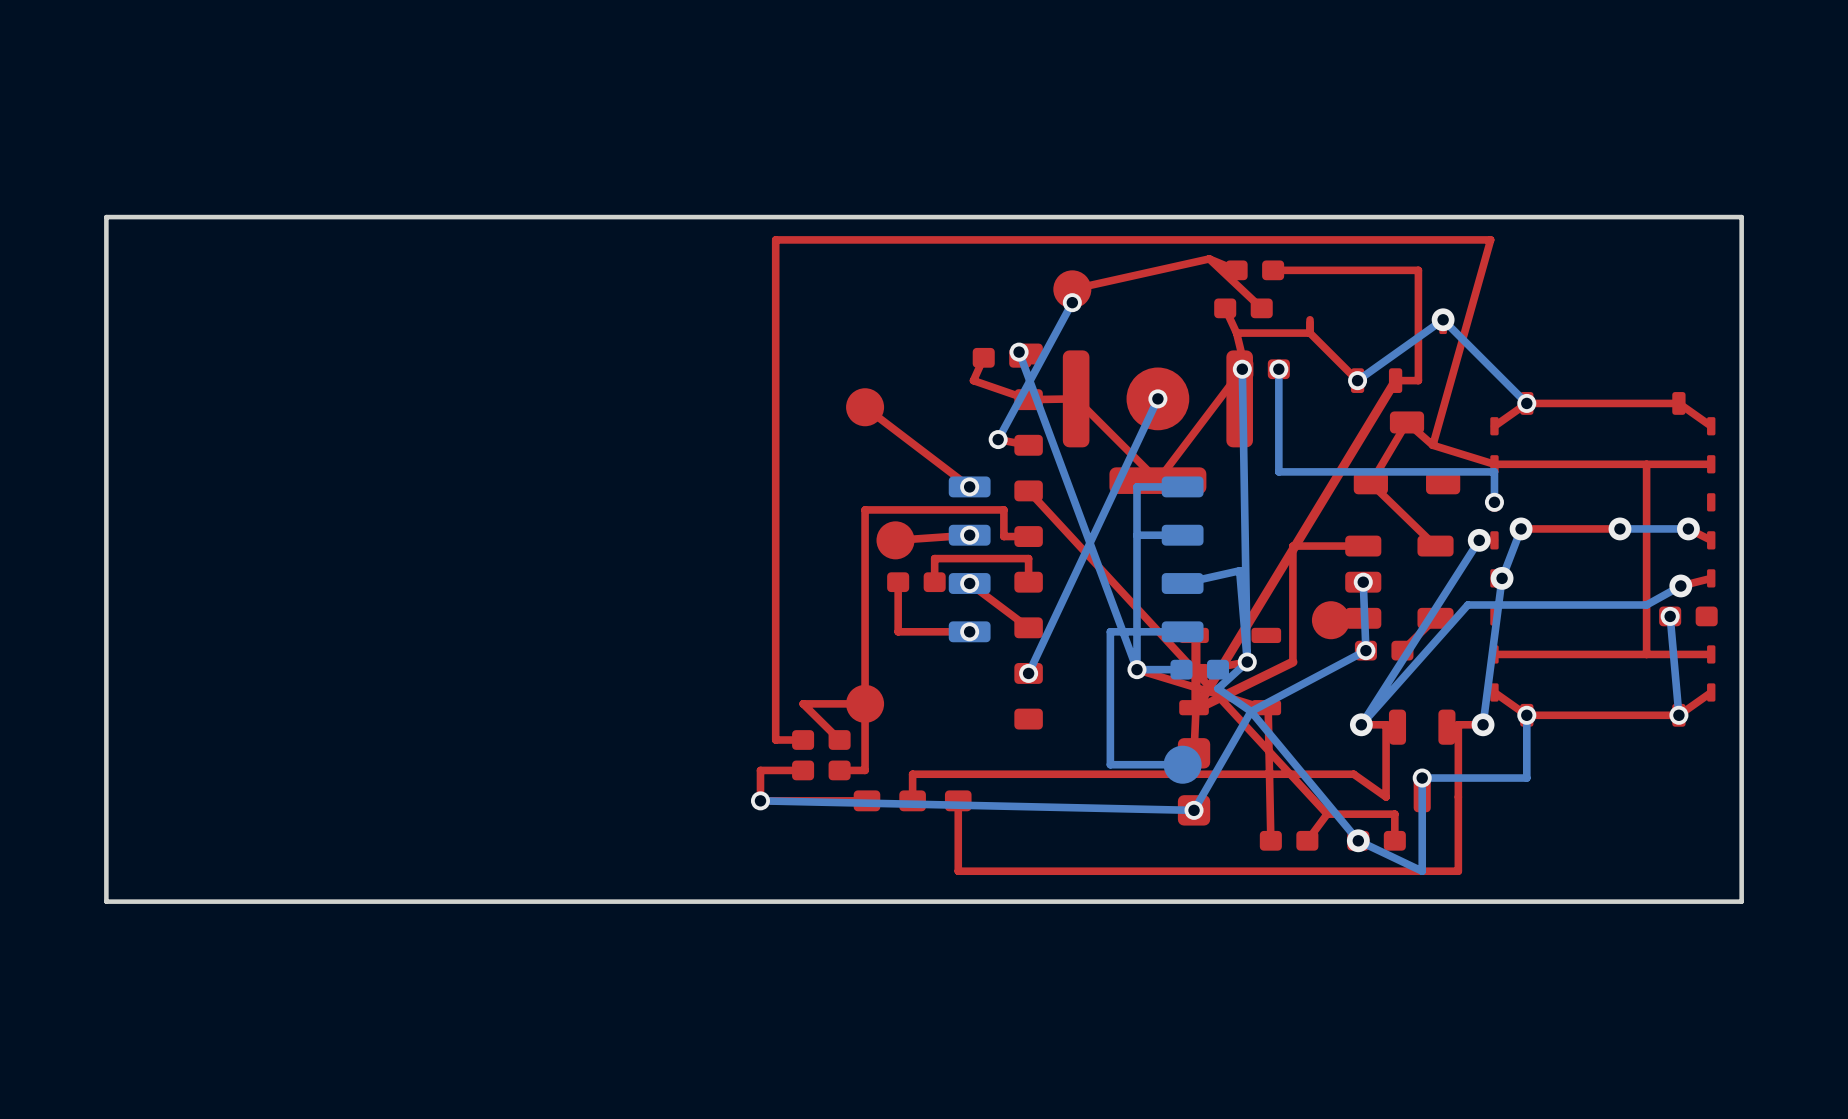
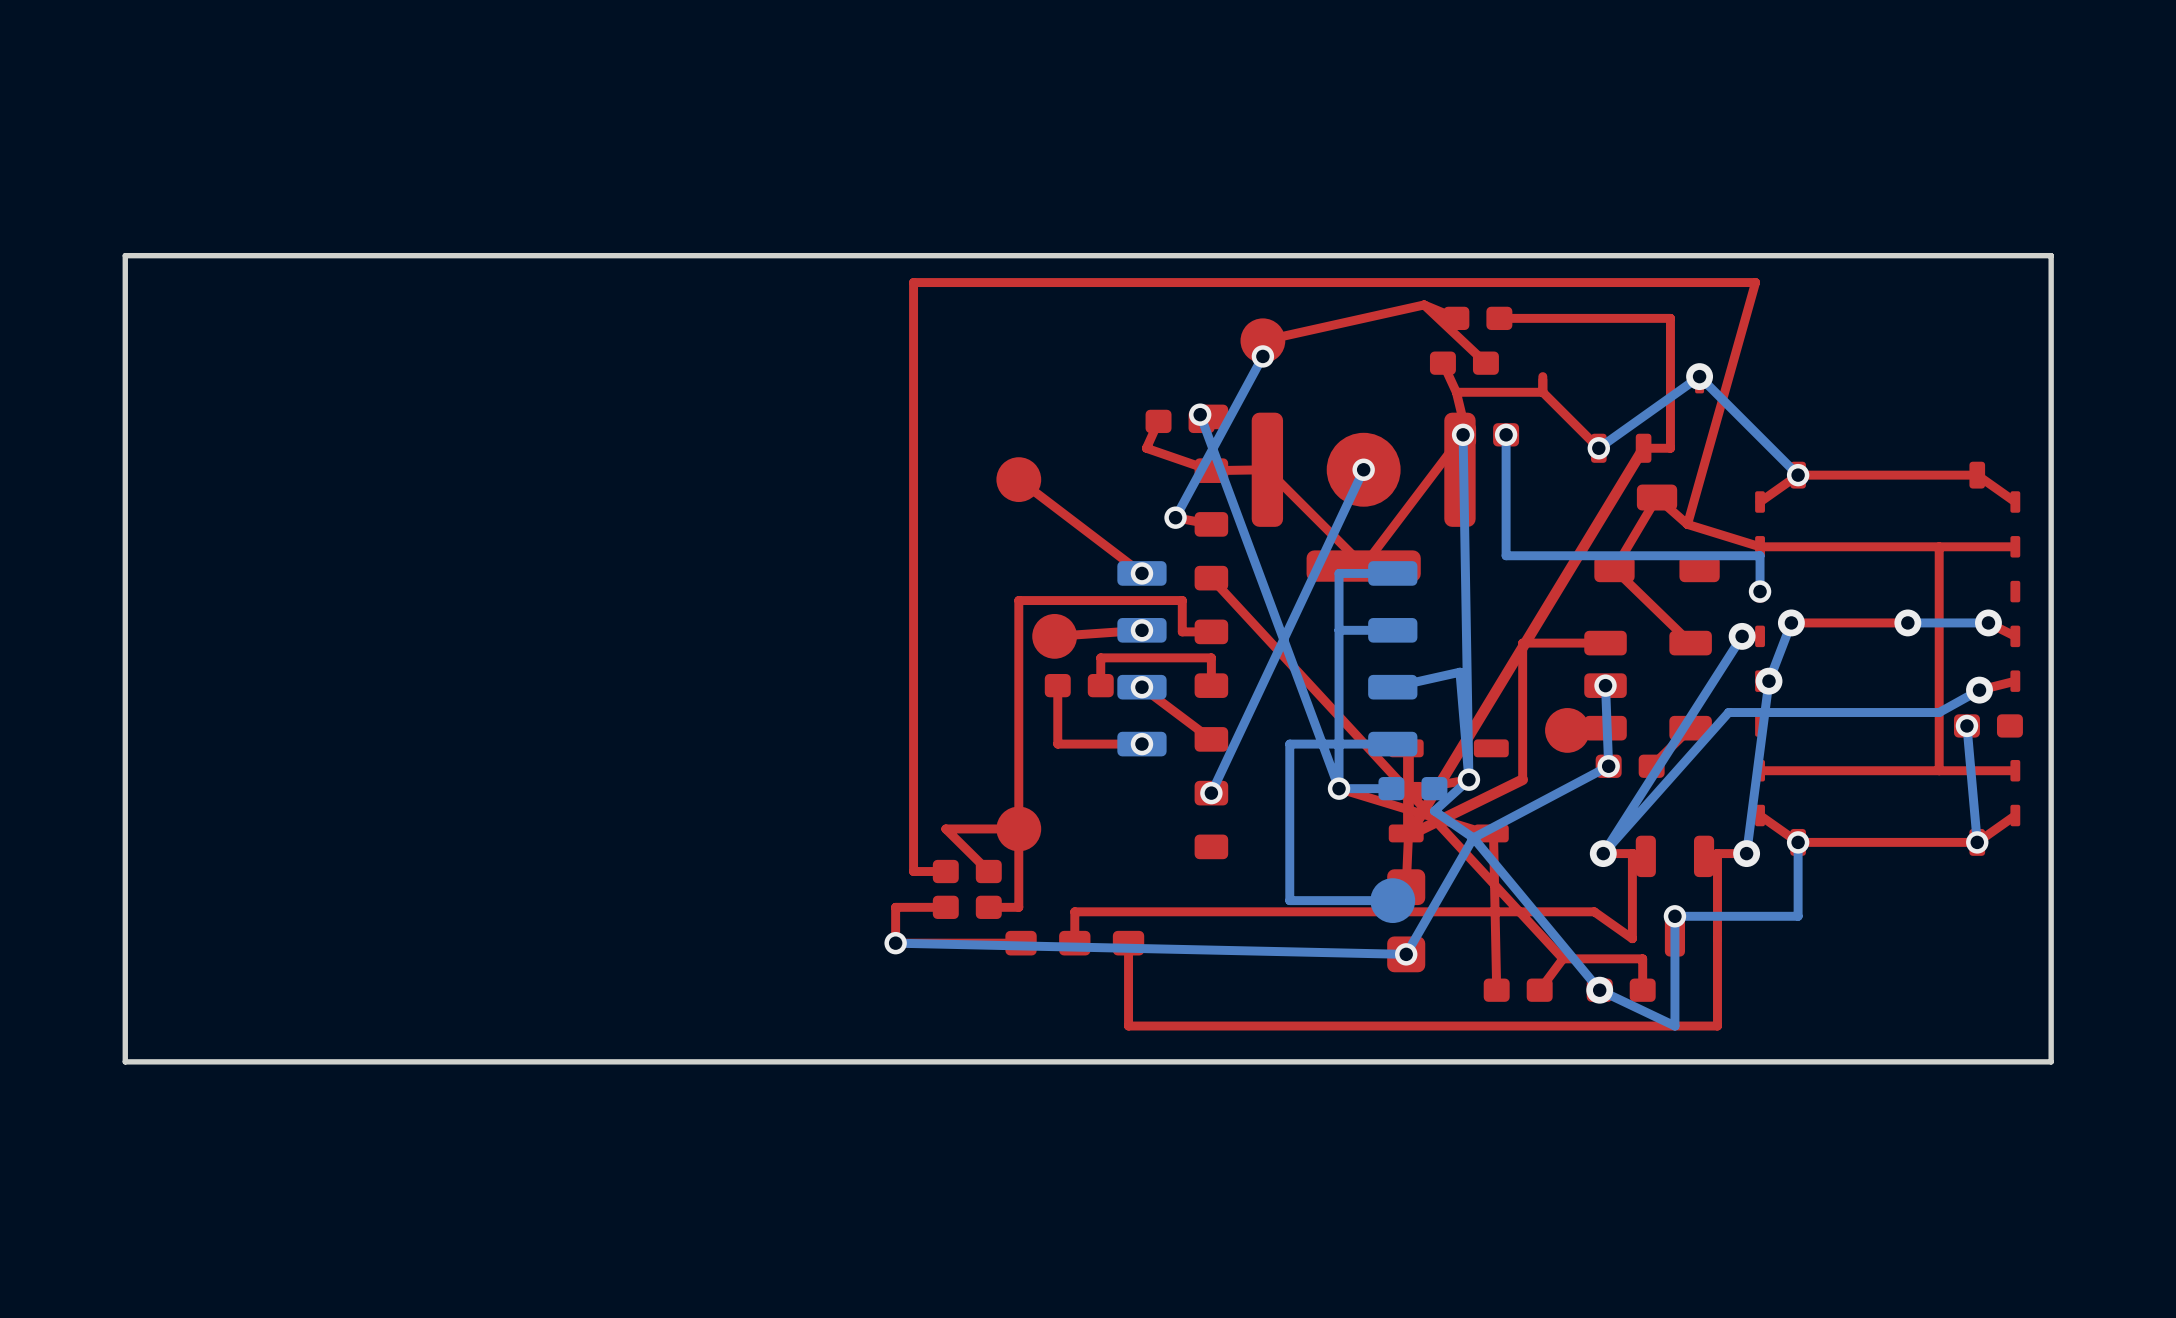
bottom track: (1110, 631) (1110, 764) -> (1307, 744) (1289, 744) (1289, 900) (1307, 900)

